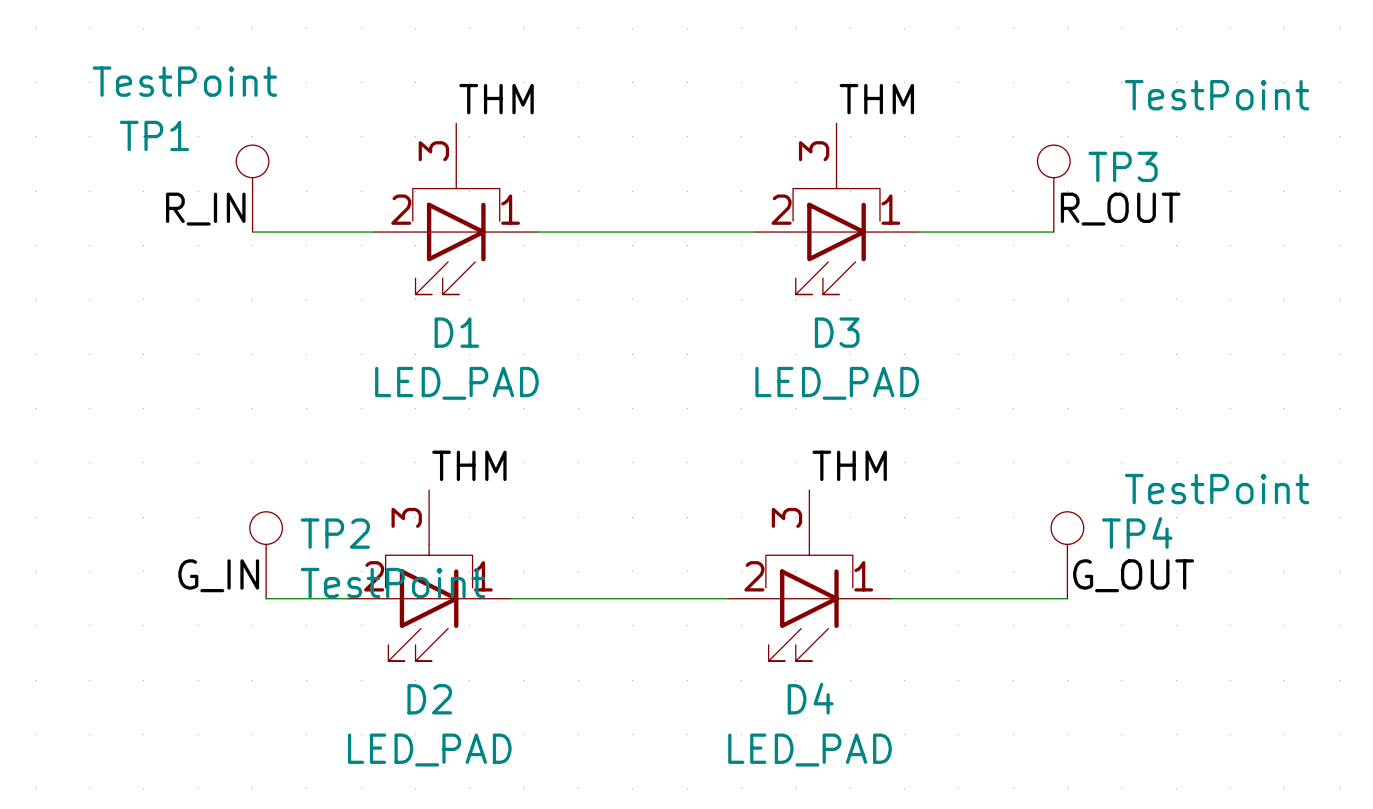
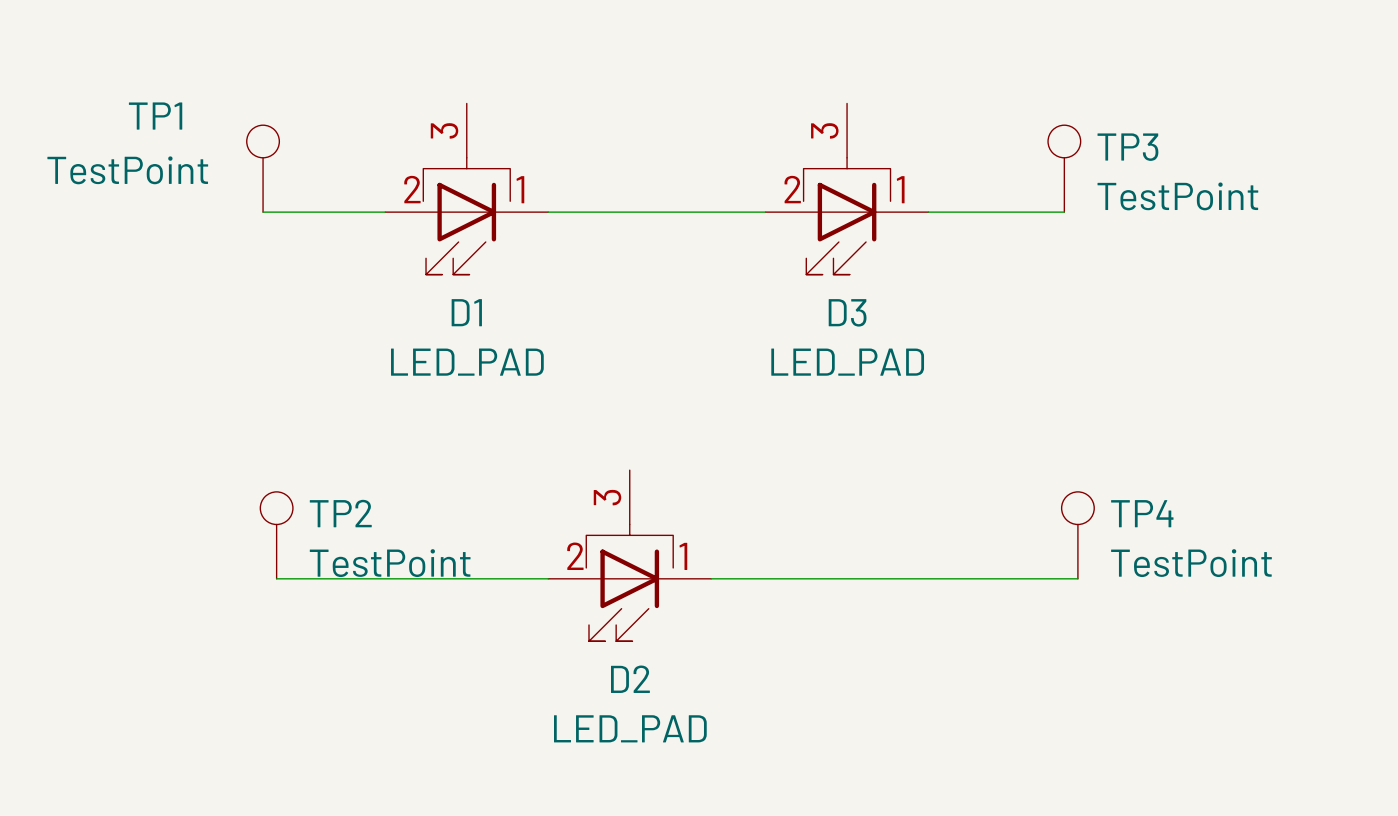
TP1 value position: TestPoint (184, 81) -> TestPoint (127, 170)
TP3 value position: TestPoint (1216, 95) -> TestPoint (1177, 196)
label: THM (496, 99) -> none
label: THM (876, 99) -> none
label: R_IN (205, 209) -> none
label: R_OUT (1120, 209) -> none
label: THM (469, 465) -> none
label: THM (849, 465) -> none
TP4 value position: TestPoint (1216, 489) -> TestPoint (1191, 563)
label: G_IN (218, 575) -> none
D2 position: (429, 575) -> (629, 555)
D4: LED_PAD (809, 575) -> none
label: G_OUT (1133, 575) -> none

